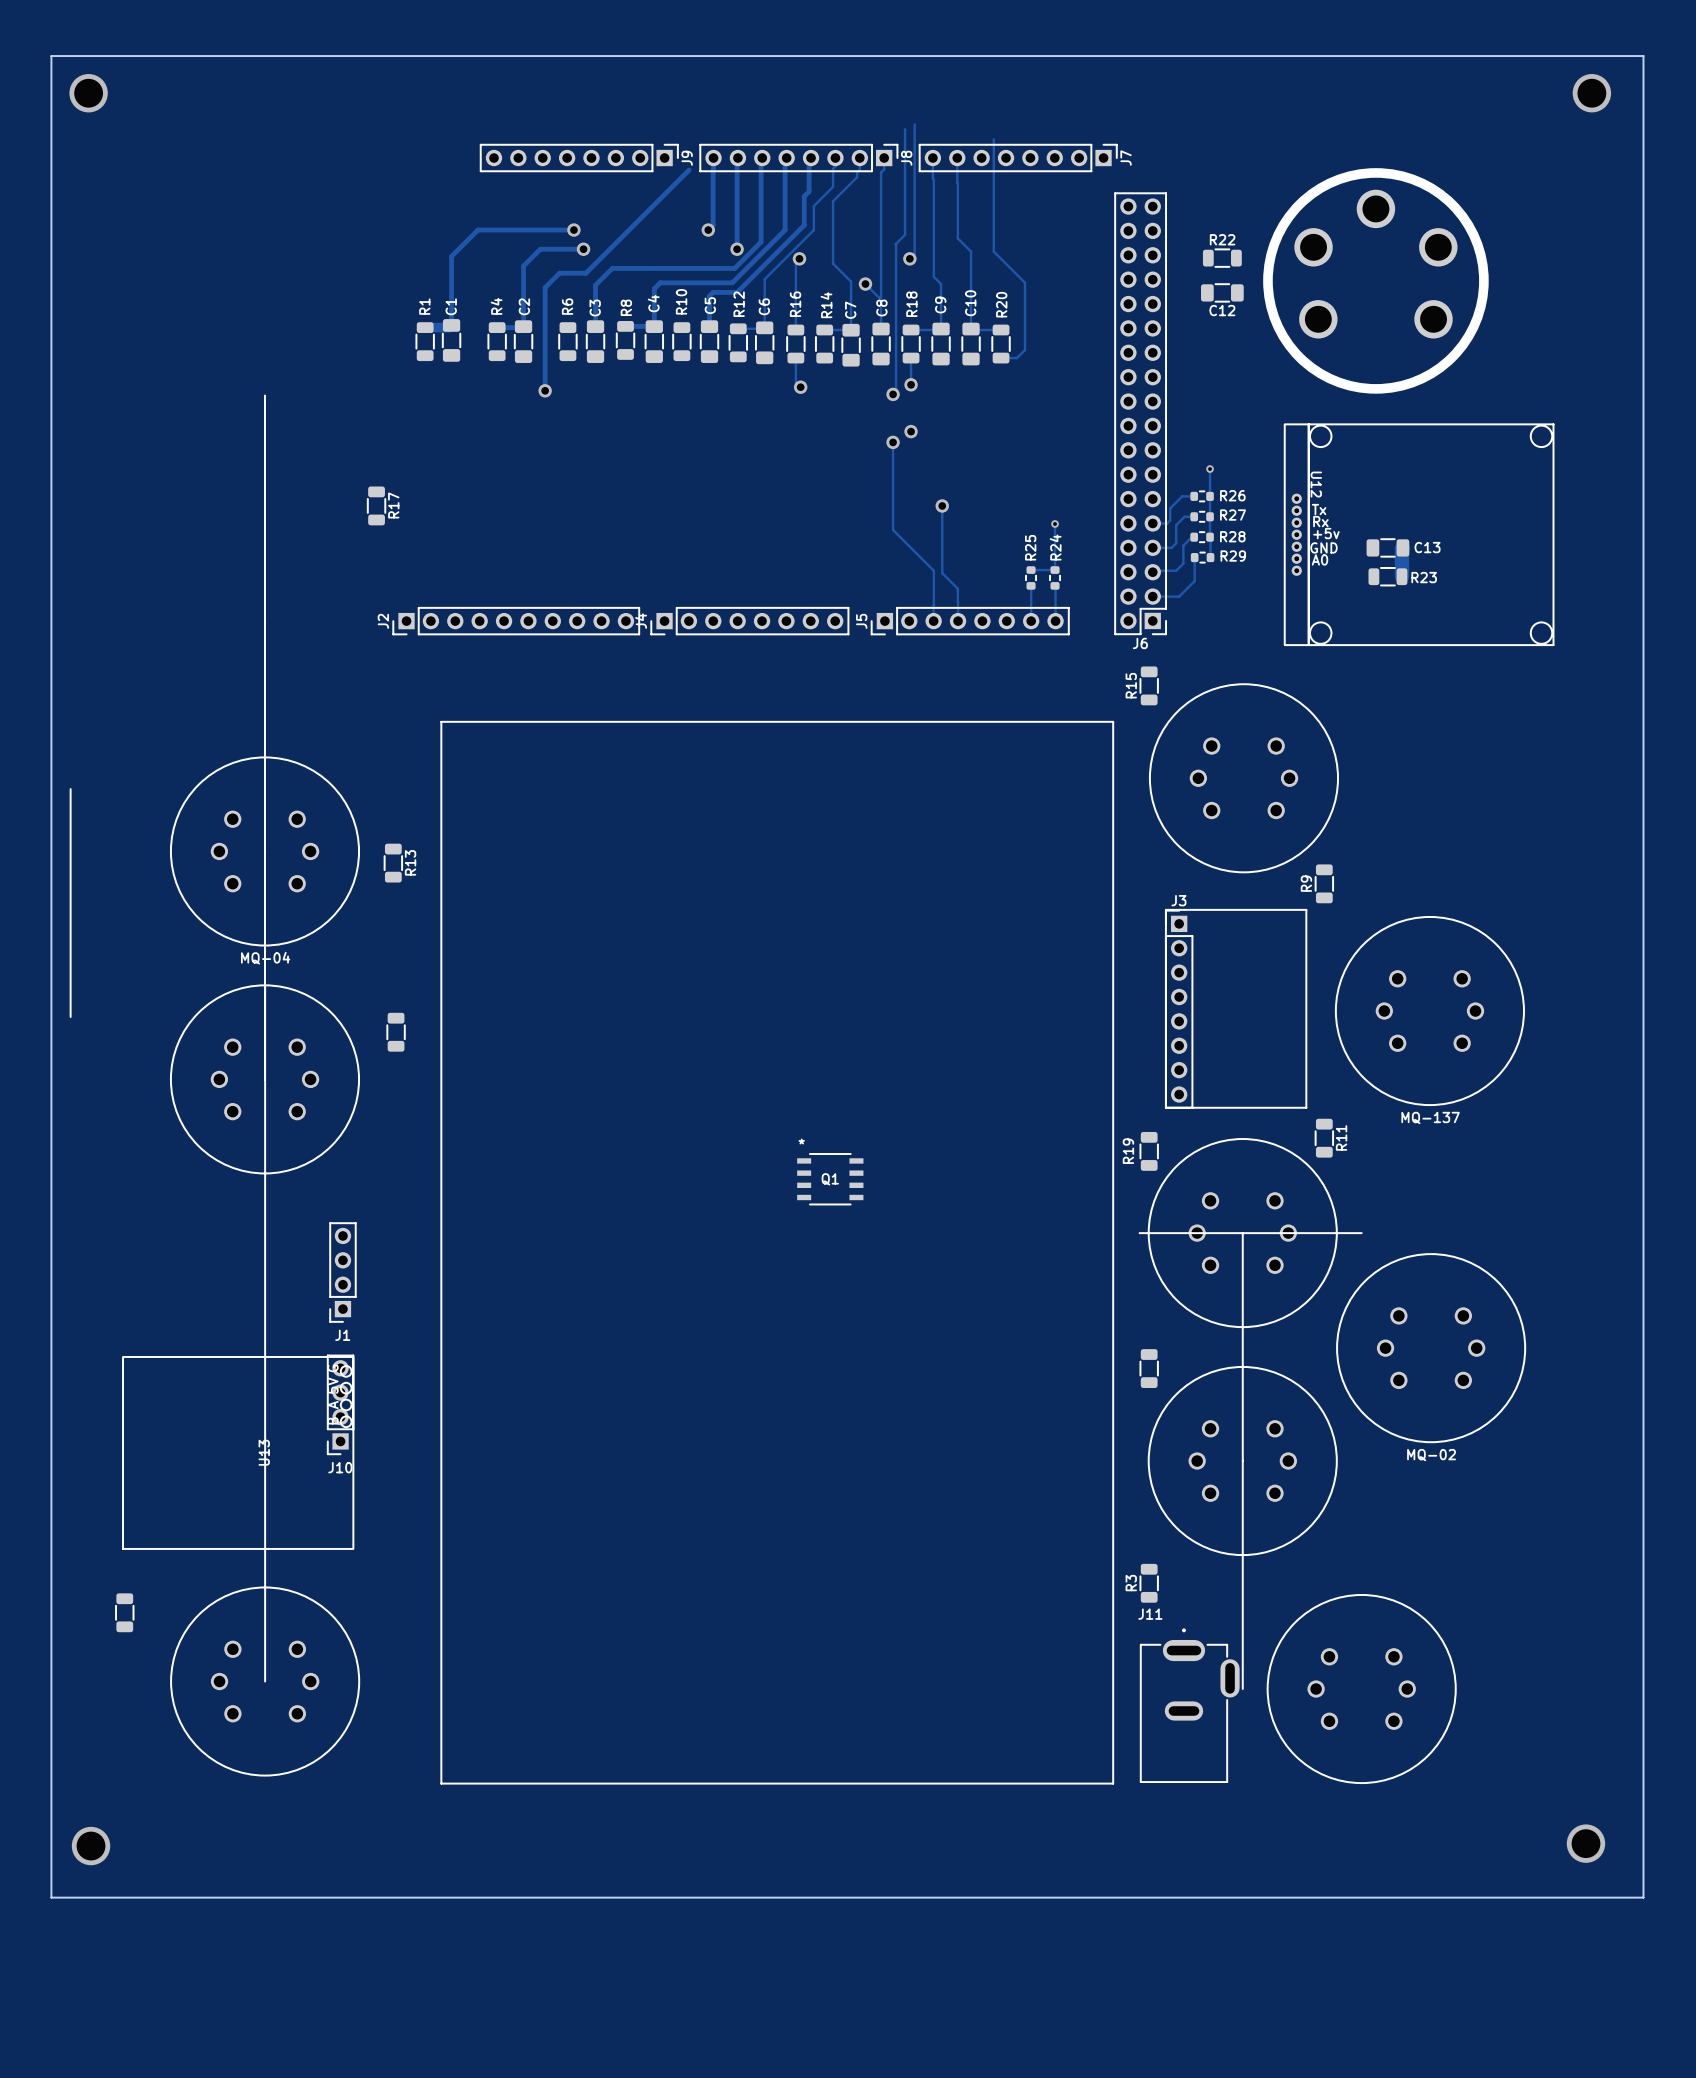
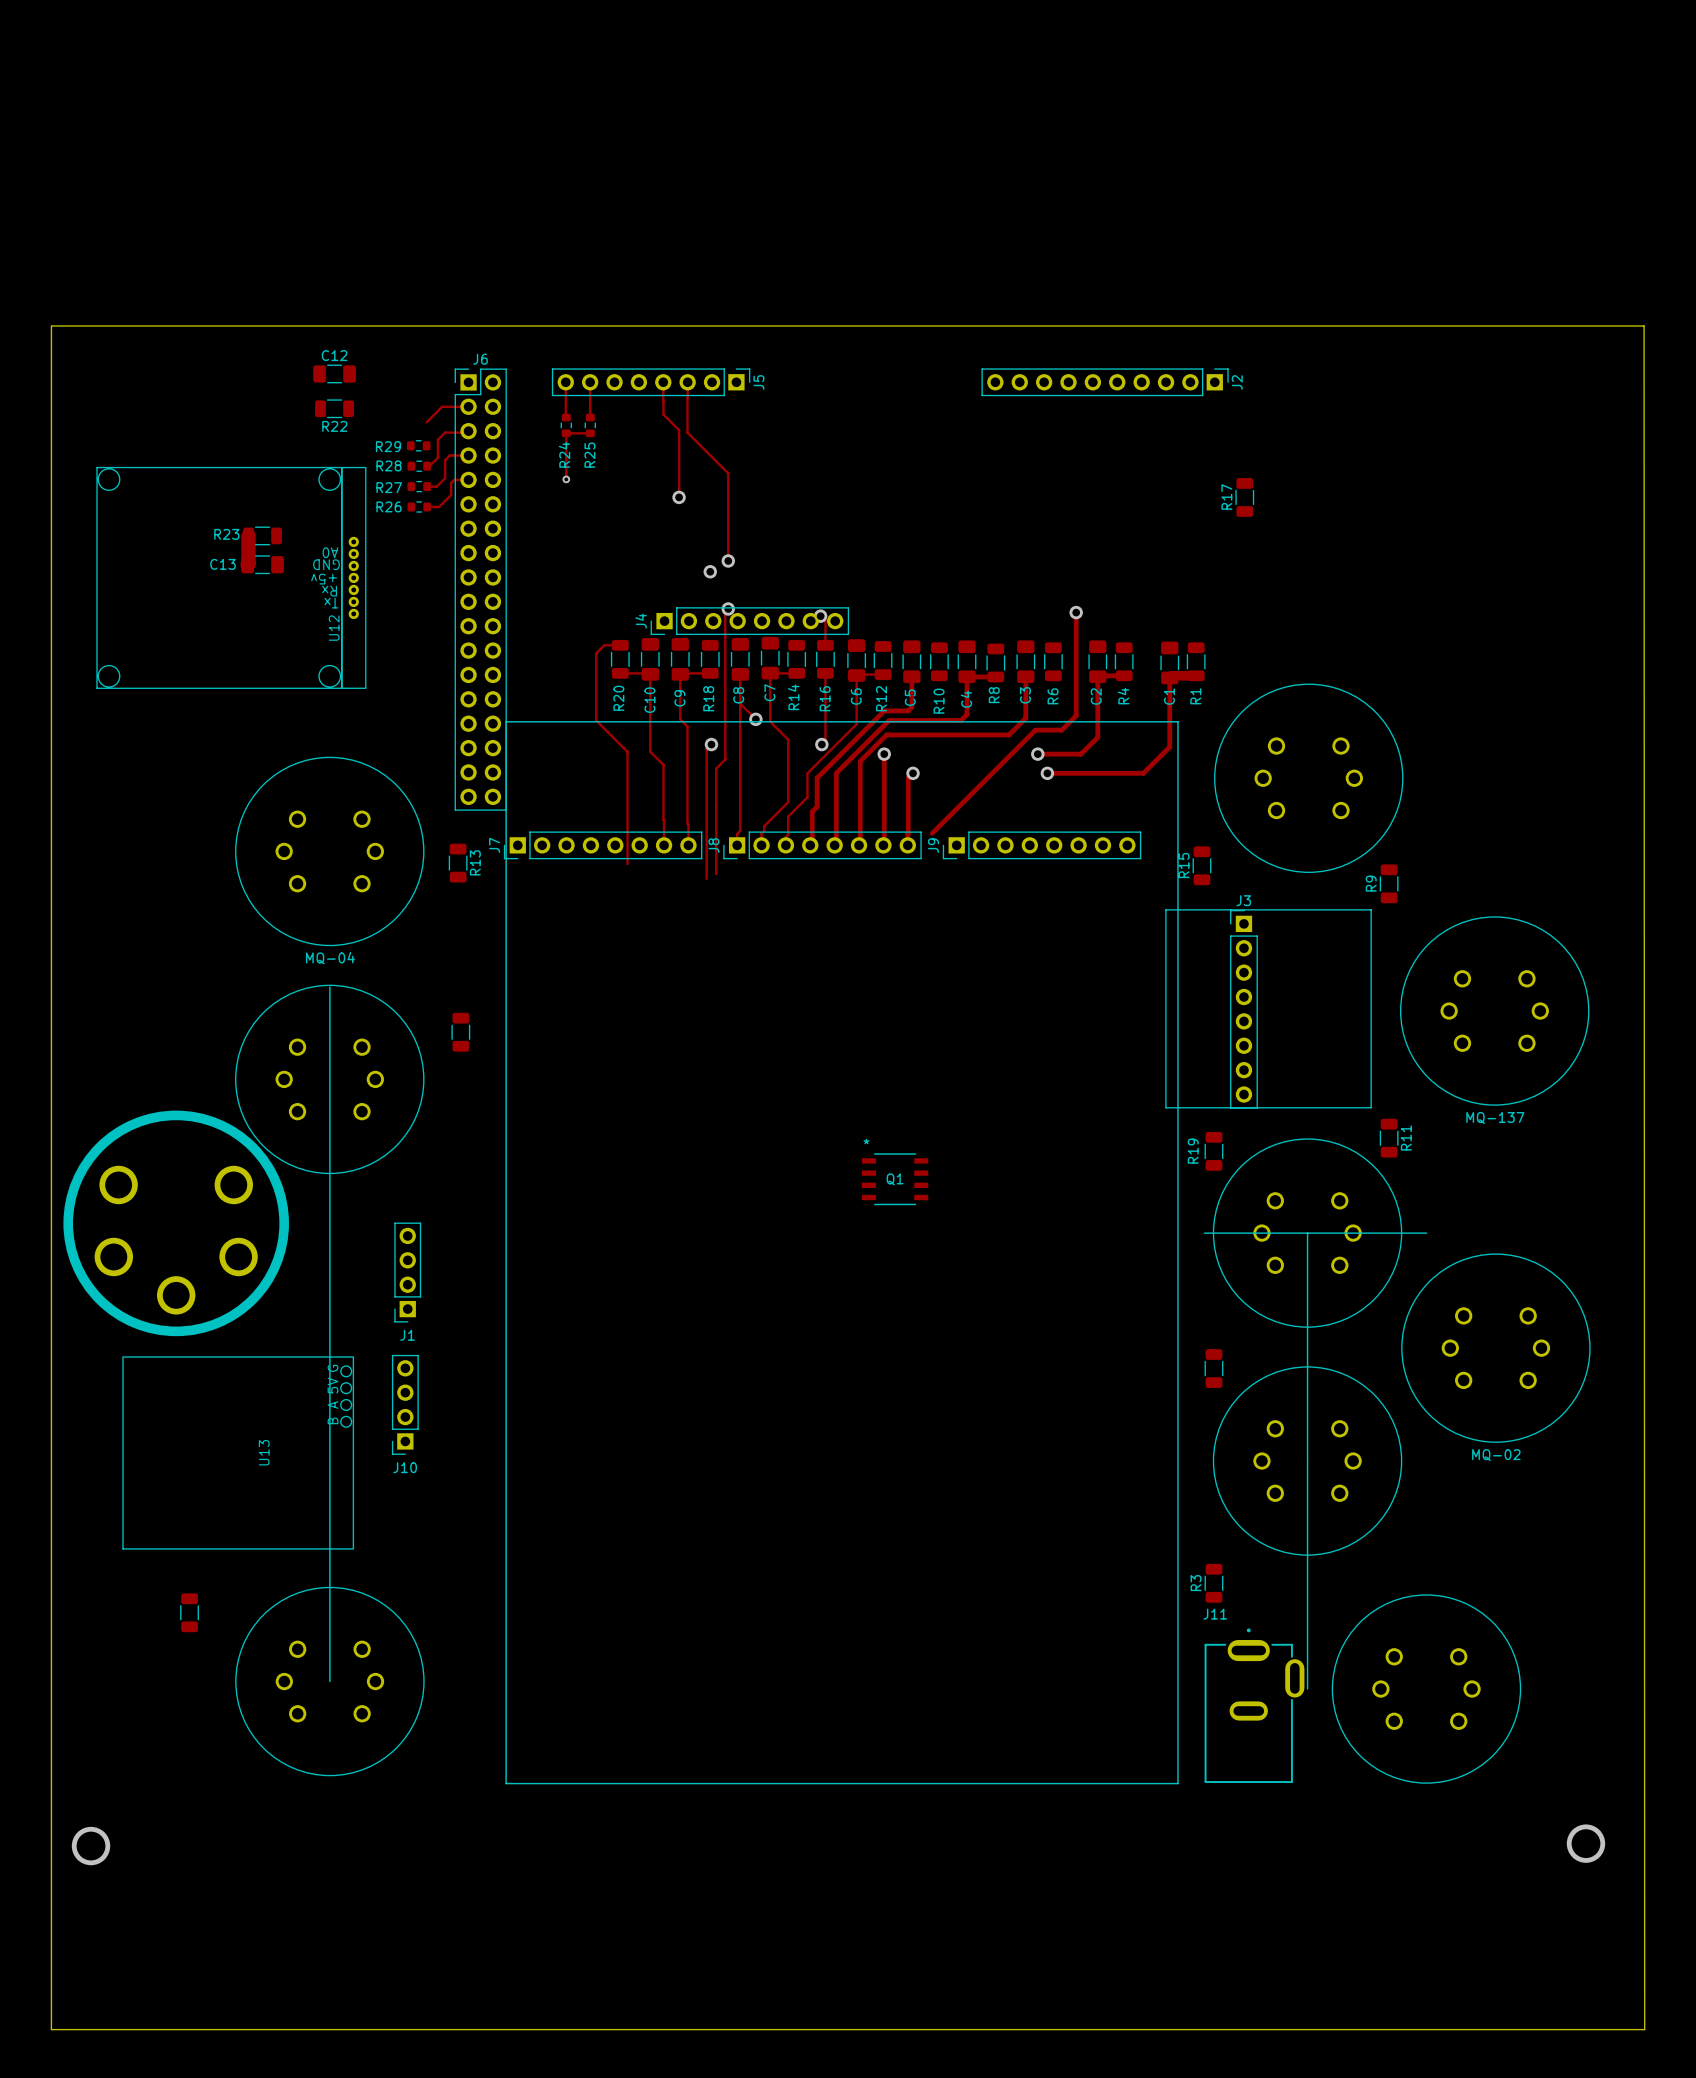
via: (88, 93) -> none
via: (1591, 93) -> none
track: (914, 124) (914, 254) (909, 258) -> none
track: (905, 129) (905, 234) (895, 244) -> none
track: (993, 139) (993, 251) (1025, 282) (1025, 350) (1016, 358) (1001, 358) -> none
J9 rotation: 0° (579, 158) -> 180° (1042, 845)
J9 position: (579, 158) -> (1042, 845)
track: (713, 158) (713, 225) (708, 230) -> none
track: (737, 158) (737, 249) -> none
track: (762, 158) (761, 242) (734, 268) (612, 268) (595, 285) (595, 326) -> none
track: (786, 158) (785, 159) (785, 230) (732, 282) (660, 282) (654, 288) (654, 326) (625, 326) -> none
J8 rotation: 0° (798, 158) -> 180° (822, 845)
J8 position: (798, 158) -> (822, 845)
track: (811, 158) (809, 159) (809, 191) (804, 196) (804, 225) (737, 292) (713, 292) (709, 296) (709, 326) -> none
track: (835, 158) (833, 186) (813, 206) (813, 230) (764, 279) (764, 327) (738, 328) -> none
track: (859, 158) (859, 169) (857, 172) (857, 177) (833, 201) (833, 263) (851, 281) (851, 330) (824, 329) -> none
track: (884, 158) (884, 169) (881, 172) (881, 329) -> none
track: (932, 158) (933, 276) (941, 284) (941, 329) (911, 329) -> none
track: (957, 158) (957, 238) (971, 251) (971, 329) (1001, 329) -> none
J7 rotation: 0° (1018, 158) -> 180° (603, 845)
J7 position: (1018, 158) -> (603, 845)
track: (689, 170) (585, 273) (559, 273) (545, 287) (545, 390) -> none
track: (573, 230) (477, 230) (451, 256) (451, 325) (449, 327) (425, 327) -> none
via: (573, 230) -> none
via: (708, 230) -> none
R22 name position: R22 (1222, 239) -> R22 (334, 426)
track: (896, 243) (896, 391) (893, 394) -> none
track: (583, 249) (540, 249) (523, 266) (523, 326) (497, 327) -> none
via: (583, 249) -> none
via: (737, 249) -> none
track: (799, 258) (795, 262) (795, 329) -> none
via: (799, 258) -> none
via: (909, 258) -> none
R22 position: (1222, 258) -> (334, 408)
part: (1375, 280) -> none
track: (865, 284) (881, 299) -> none
via: (865, 284) -> none
C12 position: (1222, 292) -> (334, 373)
R10 name position: R10 (681, 301) -> R10 (939, 701)
C4 name position: C4 (653, 303) -> C4 (966, 699)
C10 name position: C10 (970, 303) -> C10 (649, 700)
R12 name position: R12 (739, 304) -> R12 (881, 698)
R16 name position: R16 (795, 304) -> R16 (825, 698)
R18 name position: R18 (911, 304) -> R18 (708, 698)
R20 name position: R20 (1001, 304) -> R20 (618, 698)
C5 name position: C5 (710, 305) -> C5 (910, 697)
R14 name position: R14 (826, 305) -> R14 (793, 697)
C9 name position: C9 (940, 305) -> C9 (679, 698)
R1 name position: R1 (424, 306) -> R1 (1195, 696)
C1 name position: C1 (451, 306) -> C1 (1169, 696)
R4 name position: R4 (496, 306) -> R4 (1123, 696)
C2 name position: C2 (524, 306) -> C2 (1096, 696)
R6 name position: R6 (567, 306) -> R6 (1053, 696)
C6 name position: C6 (764, 306) -> C6 (856, 696)
R8 name position: R8 (626, 307) -> R8 (994, 695)
C3 name position: C3 (595, 308) -> C3 (1025, 695)
C8 name position: C8 (881, 308) -> C8 (738, 695)
C7 name position: C7 (850, 310) -> C7 (769, 692)
C12 name position: C12 (1222, 310) -> C12 (334, 355)
board edge: (51, 325) (51, 56) (1643, 56) (1643, 1897) (51, 1897) -> (52, 325) (1644, 325) (1644, 2029) (51, 2029) (51, 1897)
C1 position: (451, 340) -> (1169, 662)
R8 position: (625, 340) -> (995, 662)
R1 position: (425, 341) -> (1196, 661)
R4 position: (497, 341) -> (1124, 661)
C2 position: (523, 341) -> (1097, 661)
R6 position: (567, 341) -> (1053, 661)
C3 position: (595, 341) -> (1025, 661)
C4 position: (654, 341) -> (967, 661)
R10 position: (681, 341) -> (939, 661)
C5 position: (709, 341) -> (911, 661)
R12 position: (738, 342) -> (883, 660)
C6 position: (764, 342) -> (856, 660)
R16 position: (795, 344) -> (825, 659)
R14 position: (824, 344) -> (796, 659)
C8 position: (881, 344) -> (740, 659)
R18 position: (911, 344) -> (710, 659)
C9 position: (941, 344) -> (680, 659)
C10 position: (971, 344) -> (650, 659)
R20 position: (1001, 344) -> (620, 659)
C7 position: (851, 345) -> (770, 658)
track: (795, 358) (795, 382) (800, 387) -> none
track: (911, 358) (911, 384) -> none
track: none -> (565, 382) (566, 417)
track: none -> (590, 382) (590, 417)
track: none -> (663, 382) (663, 414) (679, 430) (679, 497)
track: none -> (687, 382) (687, 432) (728, 473) (728, 560)
via: (911, 384) -> none
via: (800, 387) -> none
via: (545, 390) -> none
via: (893, 394) -> none
line: (264, 395) (264, 1079) -> none
track: none -> (468, 406) (442, 406) (426, 422)
J6 rotation: 0° (1140, 413) -> 180° (480, 589)
J6 position: (1140, 413) -> (480, 589)
track: none -> (468, 431) (445, 432) (437, 439) (437, 457) (427, 466)
via: (911, 431) -> none
track: none -> (590, 433) (566, 433) (566, 479)
track: (893, 442) (893, 529) (933, 570) (933, 621) -> none
via: (893, 442) -> none
track: none -> (468, 455) (449, 455) (445, 460) (445, 478) (436, 486) (427, 486)
track: (1209, 468) (1210, 557) -> none
via: (1210, 469) -> none
track: none -> (468, 479) (454, 479) (451, 483) (451, 494) (439, 506) (427, 506)
via: none -> (566, 479)
R26 name position: R26 (1232, 495) -> R26 (388, 506)
track: (1194, 496) (1182, 496) (1170, 508) (1170, 520) (1167, 523) (1152, 523) -> none
R26 position: (1202, 496) -> (419, 506)
via: none -> (679, 497)
R17 position: (376, 505) -> (1244, 497)
R17 name position: R17 (393, 505) -> R17 (1226, 496)
track: (942, 505) (942, 573) (957, 588) (958, 621) -> none
via: (942, 505) -> none
R27 name position: R27 (1233, 515) -> R27 (389, 487)
track: (1194, 516) (1184, 516) (1176, 525) (1176, 543) (1171, 547) (1152, 547) -> none
R27 position: (1202, 516) -> (419, 486)
track: (1055, 523) (1055, 570) (1031, 570) -> none
via: (1055, 523) -> none
U12 rotation: 0° (1419, 534) -> 180° (231, 577)
U12 position: (1419, 534) -> (231, 577)
track: none -> (248, 535) (247, 564)
R28 name position: R28 (1232, 536) -> R28 (388, 465)
track: (1194, 537) (1183, 545) (1183, 563) (1176, 570) (1152, 572) -> none
R28 position: (1202, 537) -> (419, 466)
R25 name position: R25 (1030, 547) -> R25 (589, 455)
R24 name position: R24 (1055, 547) -> R24 (564, 454)
C13 position: (1387, 547) -> (262, 564)
track: (1402, 547) (1401, 576) -> none
C13 name position: C13 (1427, 547) -> C13 (222, 564)
R29 name position: R29 (1233, 556) -> R29 (388, 446)
track: (1194, 557) (1194, 581) (1179, 596) (1152, 596) -> none
R29 position: (1202, 557) -> (418, 445)
via: none -> (728, 560)
via: none -> (710, 571)
R23 position: (1387, 576) -> (262, 535)
R25 position: (1031, 577) -> (590, 425)
R24 position: (1055, 577) -> (566, 425)
R23 name position: R23 (1424, 577) -> R23 (226, 534)
track: (1031, 585) (1031, 621) -> none
track: (1055, 585) (1055, 621) -> none
track: none -> (728, 608) (725, 611) (725, 759)
via: none -> (728, 608)
track: none -> (1076, 612) (1076, 715) (1061, 730) (1035, 730) (932, 833)
via: none -> (1076, 612)
track: none -> (820, 616) (825, 620) (825, 645)
via: none -> (820, 616)
J2 rotation: 0° (516, 621) -> 180° (1105, 382)
J2 position: (516, 621) -> (1105, 382)
J5 rotation: 0° (970, 621) -> 180° (651, 382)
J5 position: (970, 621) -> (651, 382)
track: none -> (620, 645) (604, 645) (596, 653) (596, 720) (627, 751) (627, 864)
track: none -> (620, 673) (650, 674) (650, 751) (663, 764) (664, 845)
track: none -> (710, 673) (680, 674) (680, 719) (687, 726) (688, 845)
track: none -> (796, 673) (770, 673) (770, 721) (788, 739) (788, 802) (764, 826) (764, 830) (761, 833) (761, 845)
track: none -> (825, 673) (825, 740) (821, 744)
track: none -> (740, 674) (740, 830) (737, 834) (737, 845)
track: none -> (883, 674) (856, 675) (856, 724) (807, 773) (807, 797) (788, 816) (785, 845)
track: none -> (1124, 675) (1097, 676) (1097, 737) (1080, 754) (1037, 754)
track: none -> (1196, 675) (1171, 675) (1169, 677) (1169, 746) (1143, 773) (1047, 773)
track: none -> (911, 676) (911, 707) (908, 710) (884, 710) (817, 778) (817, 806) (812, 811) (812, 843) (810, 845)
track: none -> (995, 676) (967, 676) (967, 714) (961, 720) (889, 720) (836, 773) (836, 843) (834, 845)
track: none -> (1025, 676) (1025, 718) (1009, 734) (886, 734) (860, 761) (859, 845)
R15 position: (1149, 685) -> (1201, 865)
track: none -> (740, 703) (755, 719)
via: none -> (755, 719)
line: (506, 721) (441, 721) (441, 1783) (506, 1783) -> (506, 721) (506, 1783)
line: (1113, 721) (1113, 1783) -> (1113, 721) (1177, 721) (1177, 1783) (1113, 1783)
track: none -> (711, 744) (706, 749) (706, 878)
via: none -> (711, 744)
via: none -> (821, 744)
track: none -> (884, 754) (883, 845)
via: none -> (884, 754)
via: none -> (1037, 754)
track: none -> (725, 758) (716, 768) (716, 874)
track: none -> (913, 773) (908, 778) (907, 845)
via: none -> (913, 773)
via: none -> (1047, 773)
part position: (1243, 778) -> (1308, 778)
line: (70, 789) (70, 1017) -> none
part position: (264, 851) -> (329, 851)
R13 position: (393, 863) -> (458, 863)
R9 position: (1324, 883) -> (1389, 883)
line: (1306, 909) (1306, 1107) -> (1306, 909) (1371, 909) (1371, 1107) (1306, 1107)
line: (265, 987) (265, 1681) -> (329, 987) (329, 1681)
J3 position: (1179, 1009) -> (1243, 1009)
part position: (1429, 1011) -> (1494, 1011)
part position: (396, 1032) -> (460, 1032)
part position: (264, 1079) -> (329, 1079)
R11 position: (1324, 1138) -> (1389, 1138)
R19 position: (1149, 1151) -> (1213, 1151)
Q1 position: (830, 1179) -> (895, 1179)
part: none -> (176, 1223)
line: (1139, 1233) (1204, 1233) -> (1361, 1233) (1426, 1233)
line: (1242, 1233) (1242, 1688) -> (1307, 1233) (1307, 1688)
part position: (1242, 1233) -> (1307, 1233)
J1 position: (342, 1272) -> (407, 1272)
part position: (1431, 1348) -> (1495, 1348)
part position: (1149, 1368) -> (1213, 1368)
J10 position: (340, 1404) -> (405, 1404)
part position: (1242, 1461) -> (1307, 1461)
R3 position: (1149, 1583) -> (1213, 1583)
part position: (124, 1612) -> (189, 1612)
part position: (265, 1681) -> (329, 1681)
part position: (1361, 1689) -> (1426, 1689)
J11 position: (1189, 1705) -> (1254, 1705)

